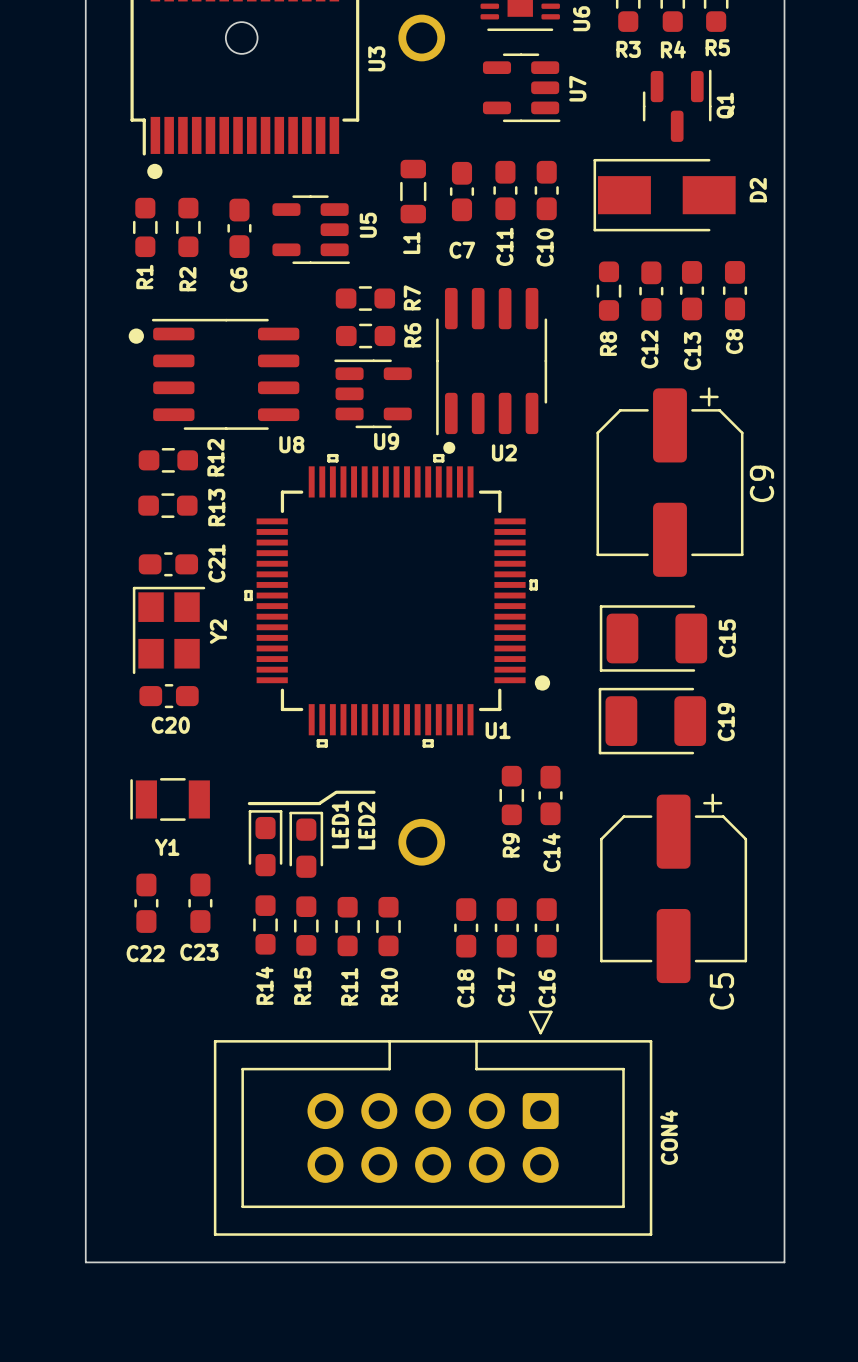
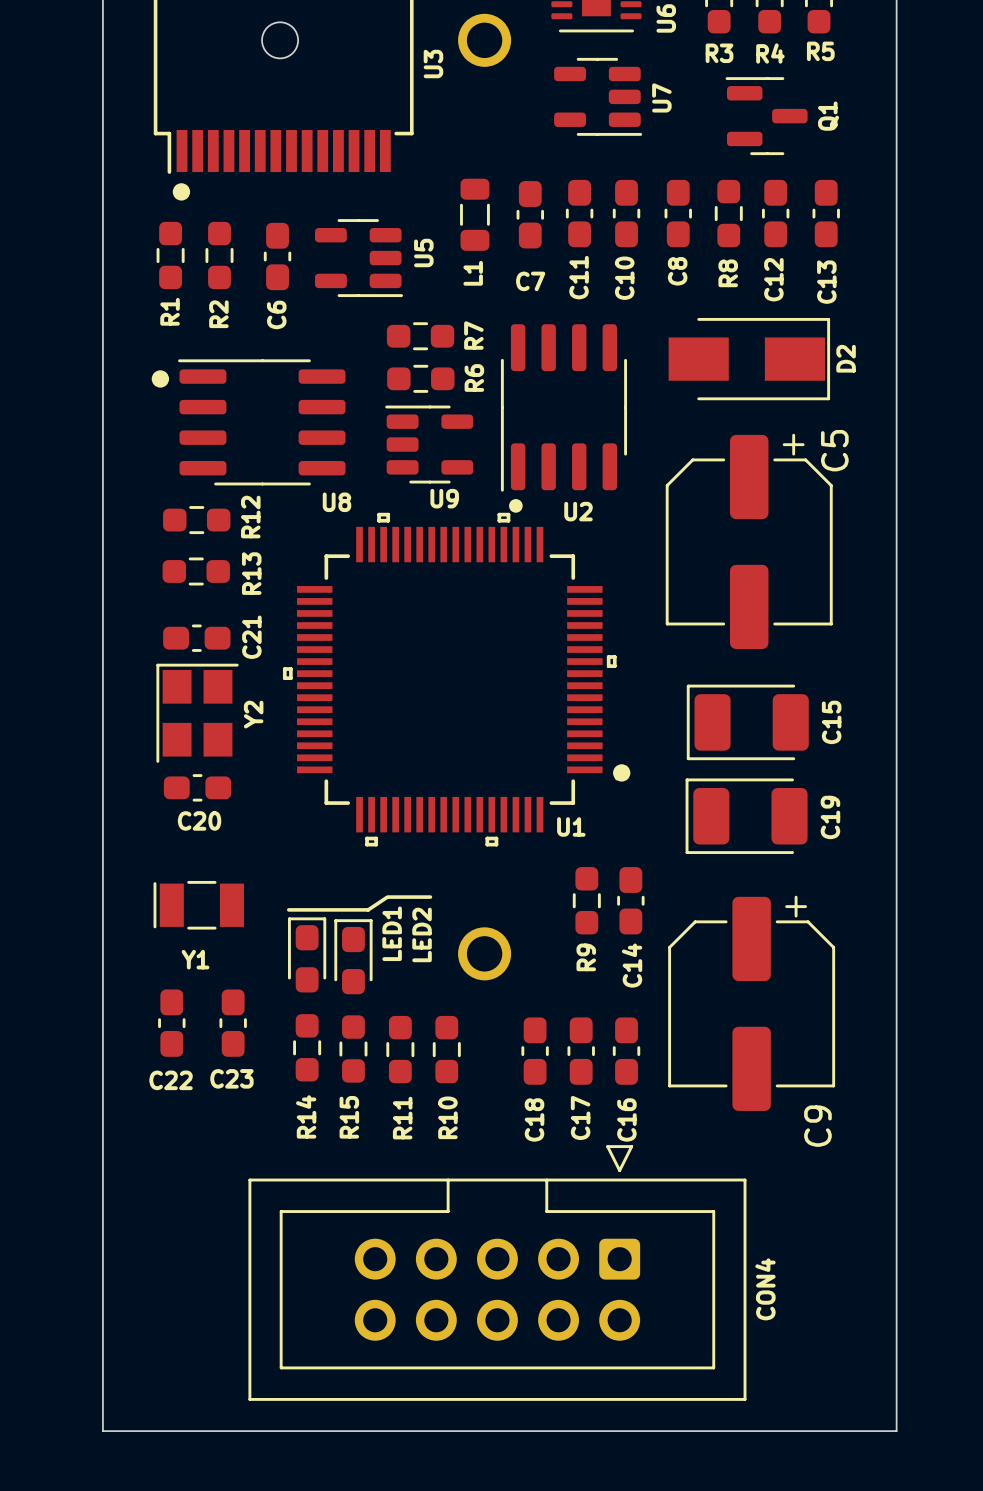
Q1 rotation: 0° (677, 105) -> 90° counterclockwise (766, 116)
D2 rotation: 0° (664, 195) -> 180° (749, 359)
D2 position: (664, 195) -> (749, 359)
C13 position: (692, 290) -> (826, 213)
C8 position: (735, 290) -> (678, 213)
R8 position: (608, 291) -> (728, 213)
C12 position: (651, 291) -> (775, 213)
C9 footprint: [596, 387, 744, 577] -> [668, 895, 836, 1111]
C9 name position: C9 (761, 483) -> C9 (817, 1126)
C5 position: (673, 888) -> (749, 541)
C5 name position: C5 (721, 991) -> C5 (834, 450)

